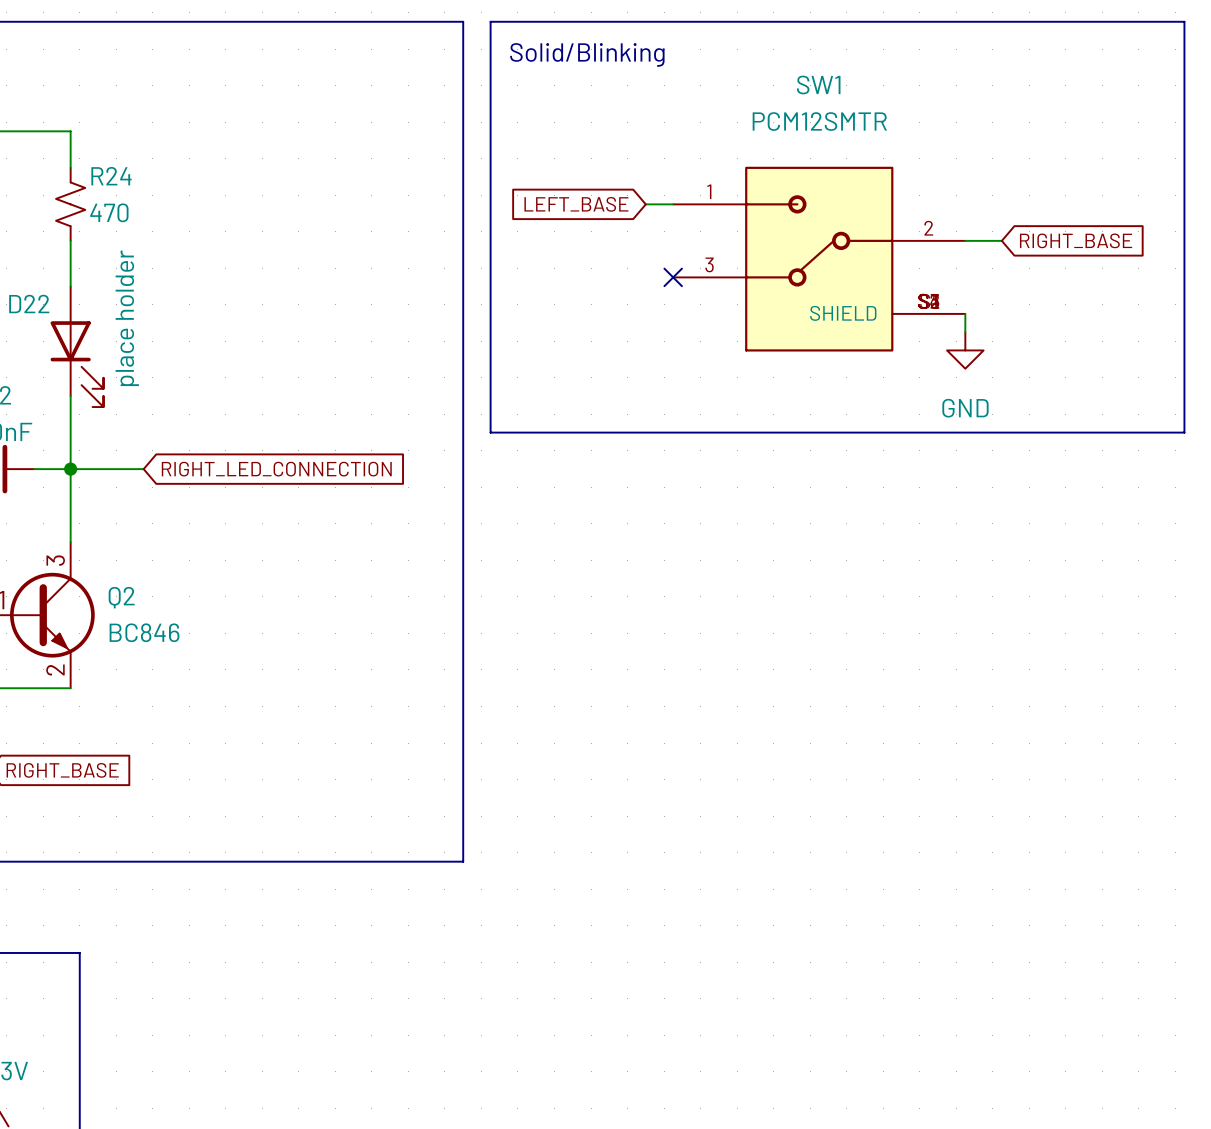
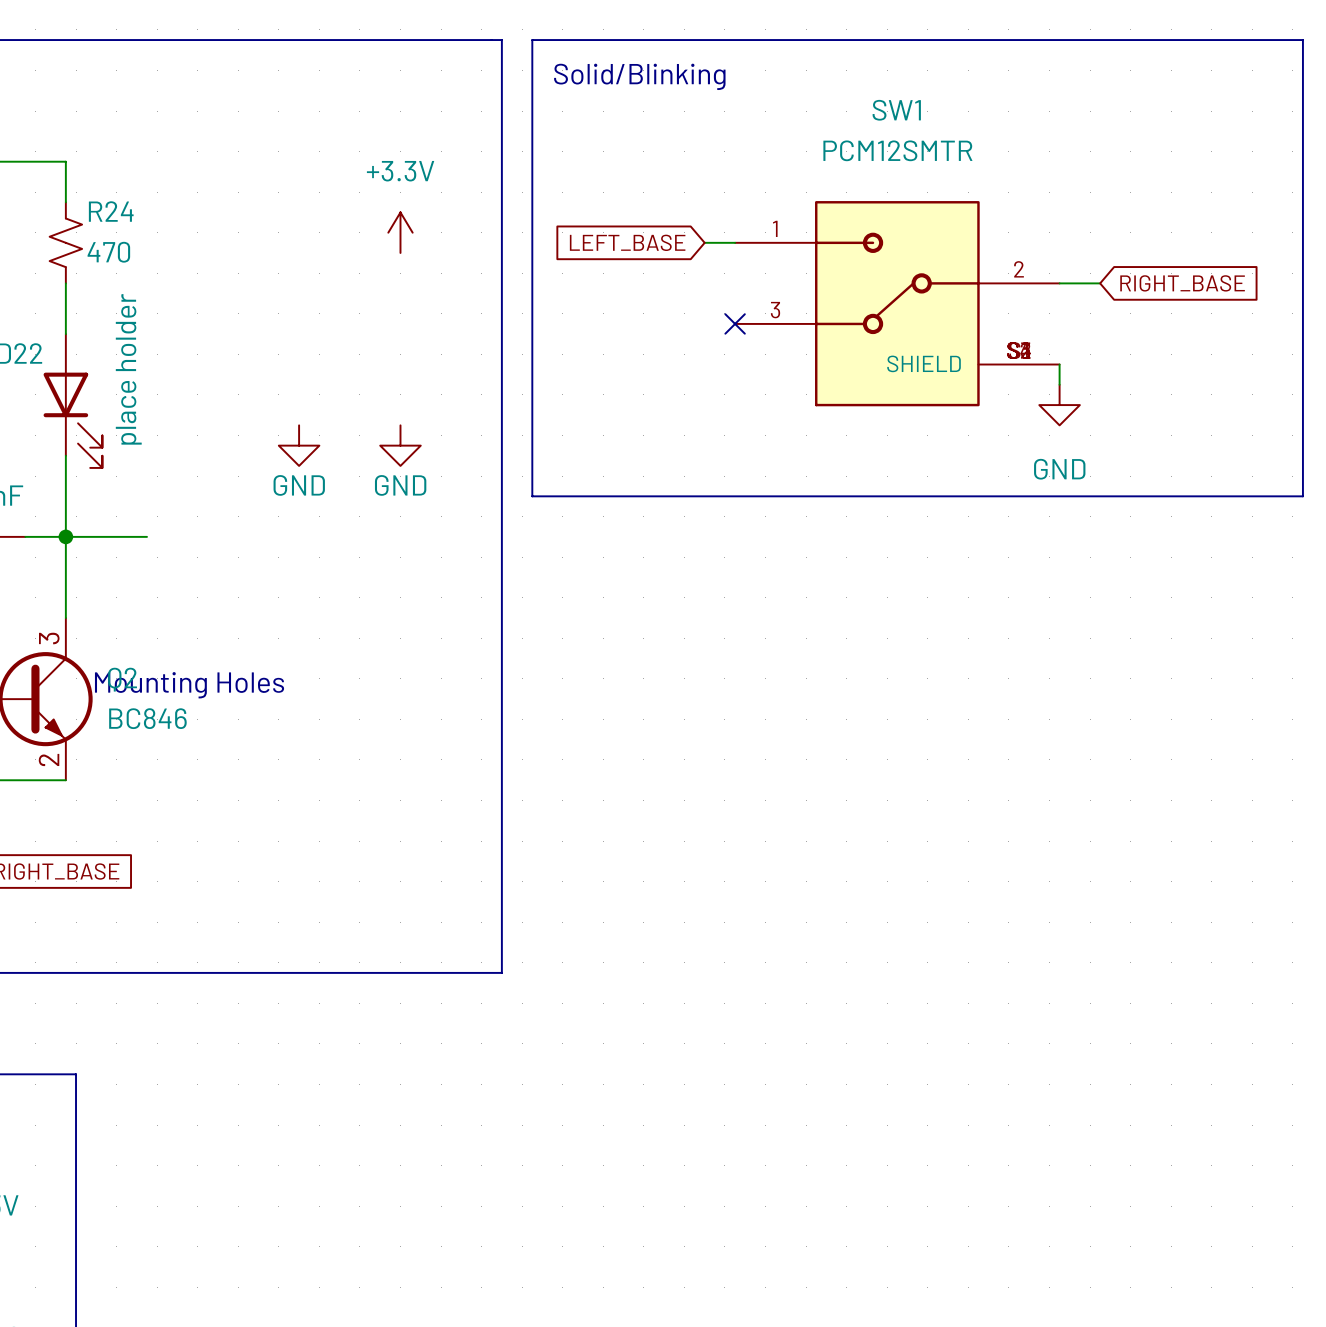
power symbol: none -> +3.3V (400, 232)
power symbol: none -> GND (299, 445)
power symbol: none -> GND (400, 445)
global label: RIGHT_LED_CONNECTION (276, 469) -> none
text: none -> Mounting Holes (189, 685)

